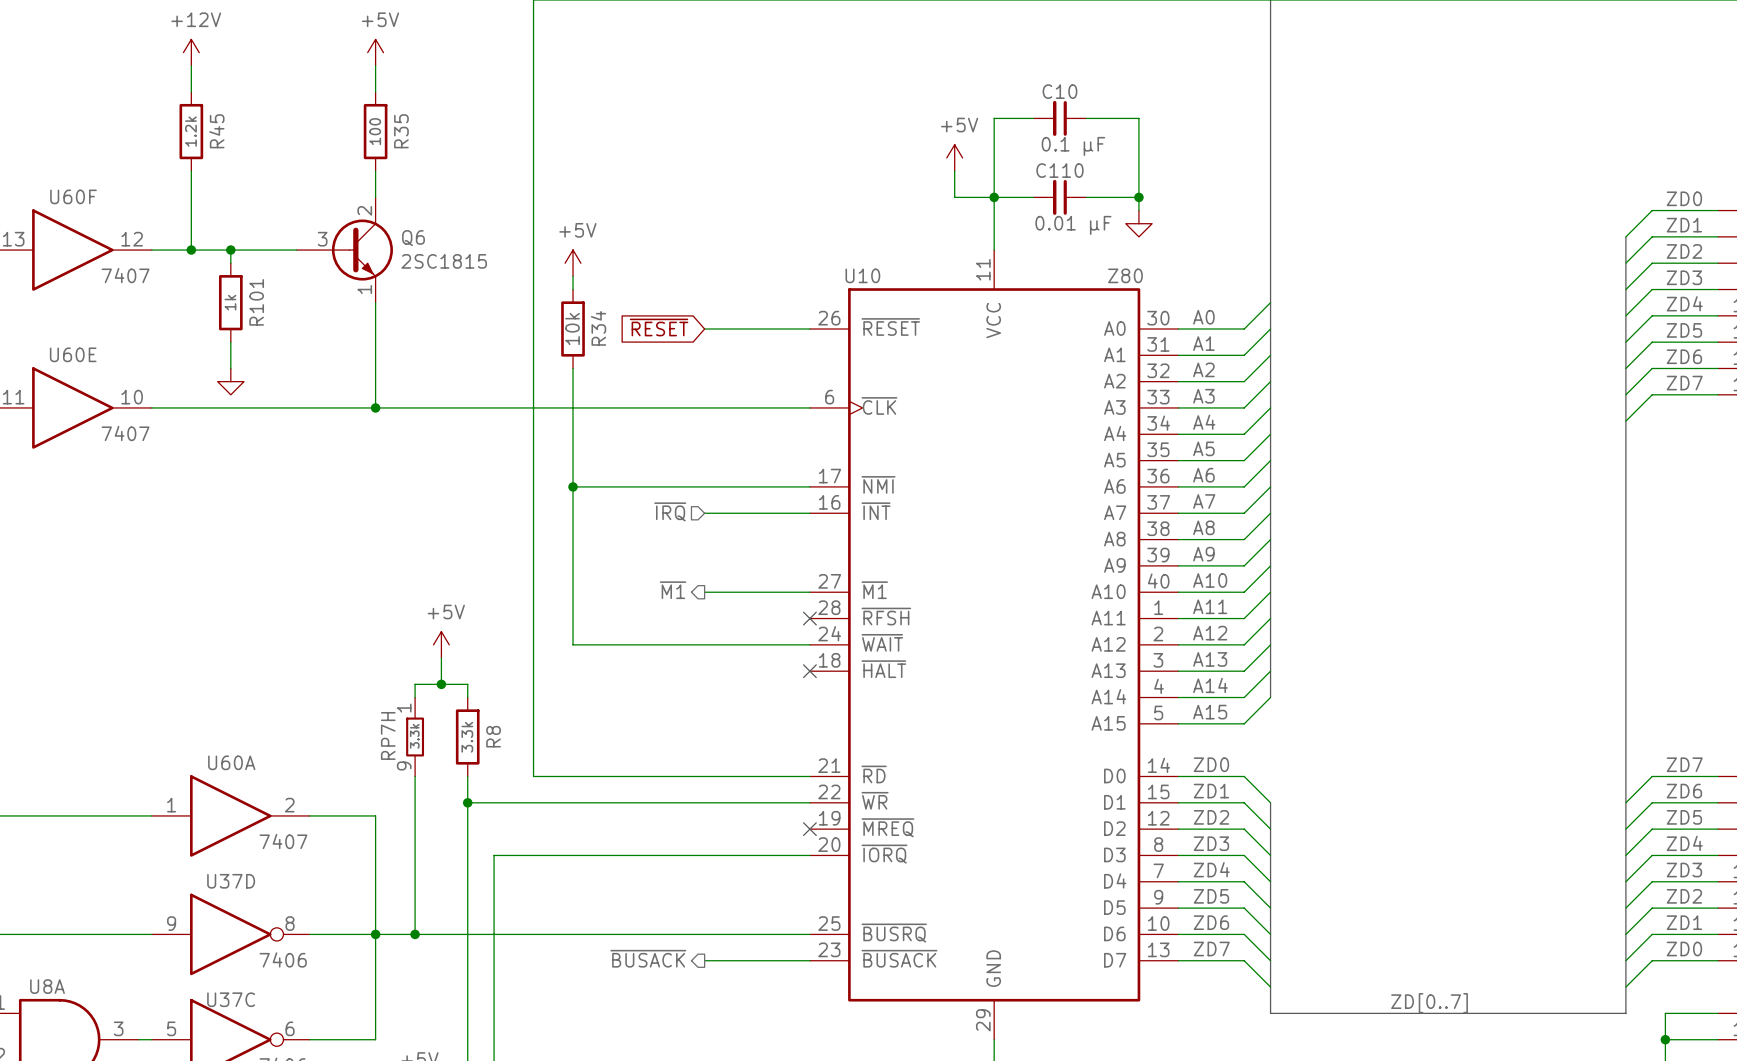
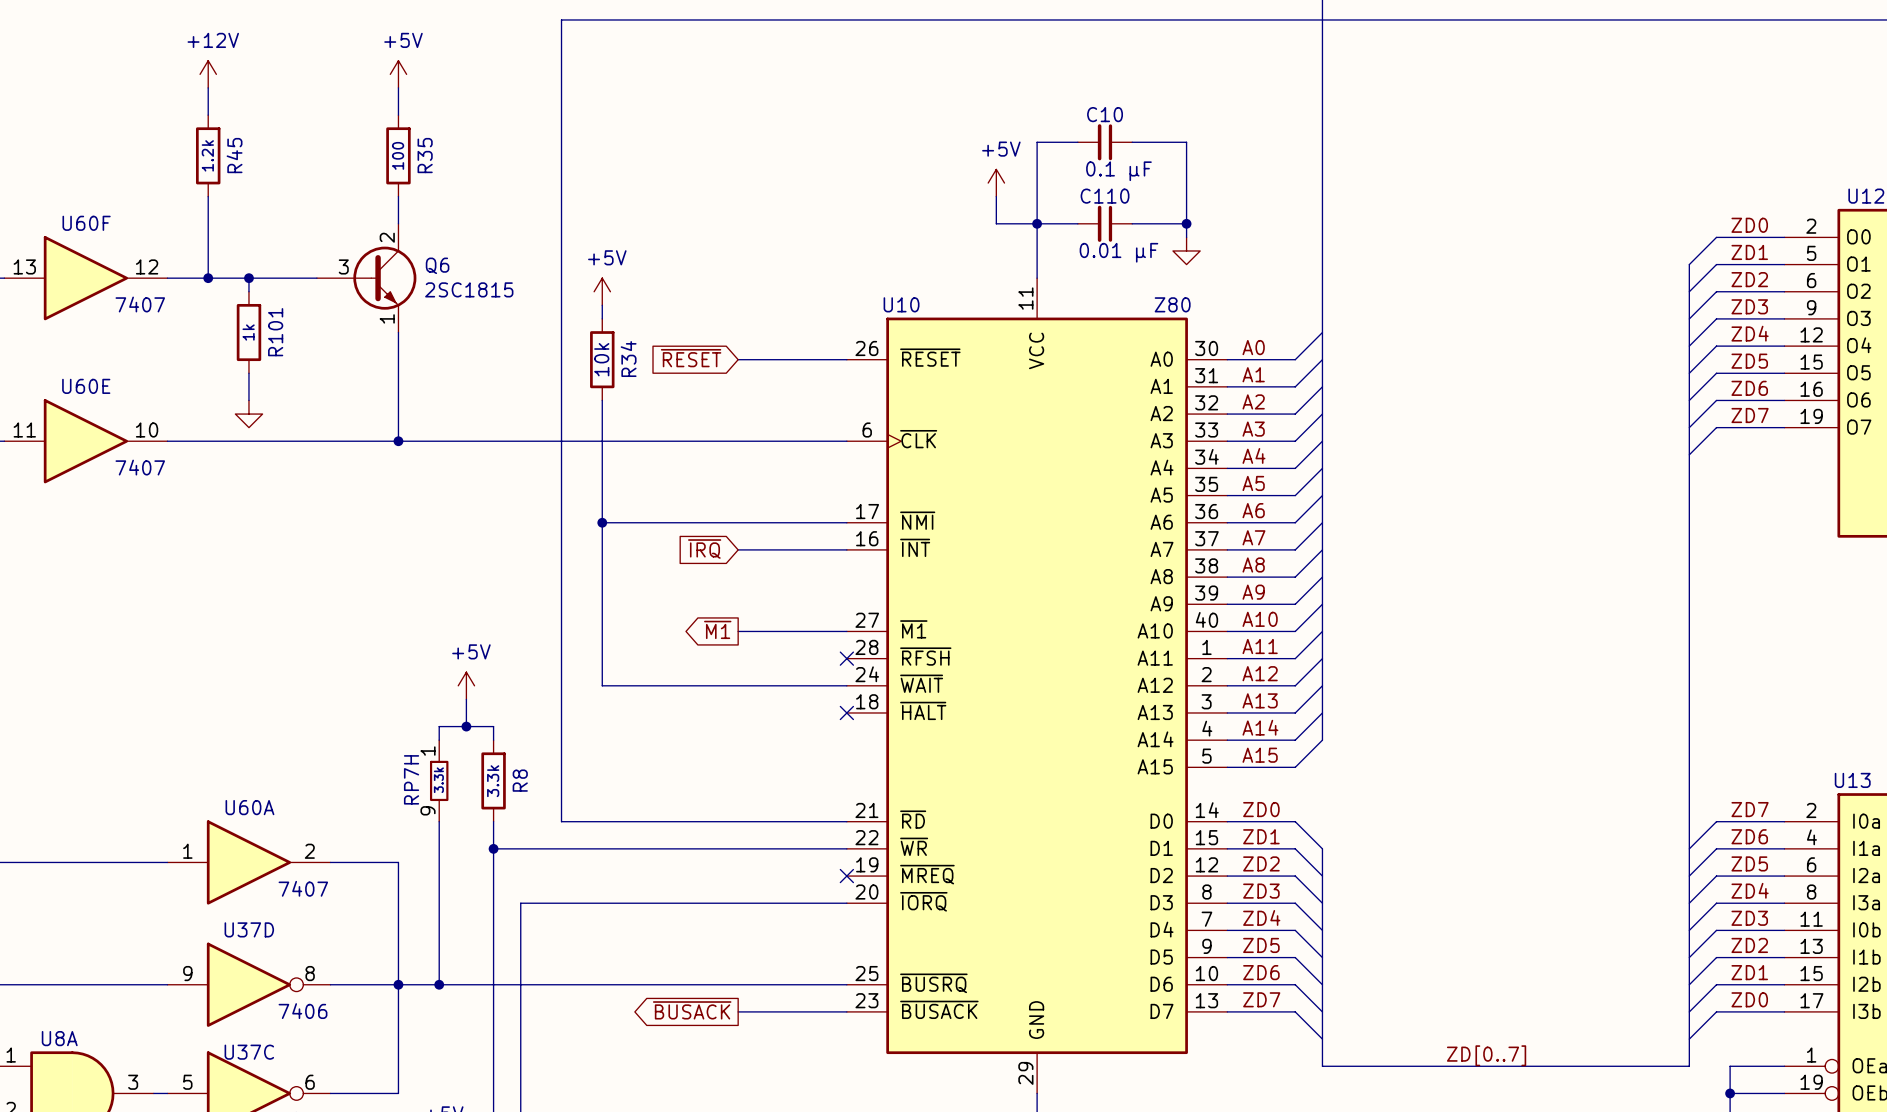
hierarchical label: ~{IRQ} (670, 511) -> none
global label: none -> ~{IRQ} (704, 549)
hierarchical label: ~{M1} (673, 590) -> none
global label: none -> ~{M1} (717, 629)
hierarchical label: ~{BUSACK} (648, 958) -> none
global label: none -> ~{BUSACK} (692, 1010)

